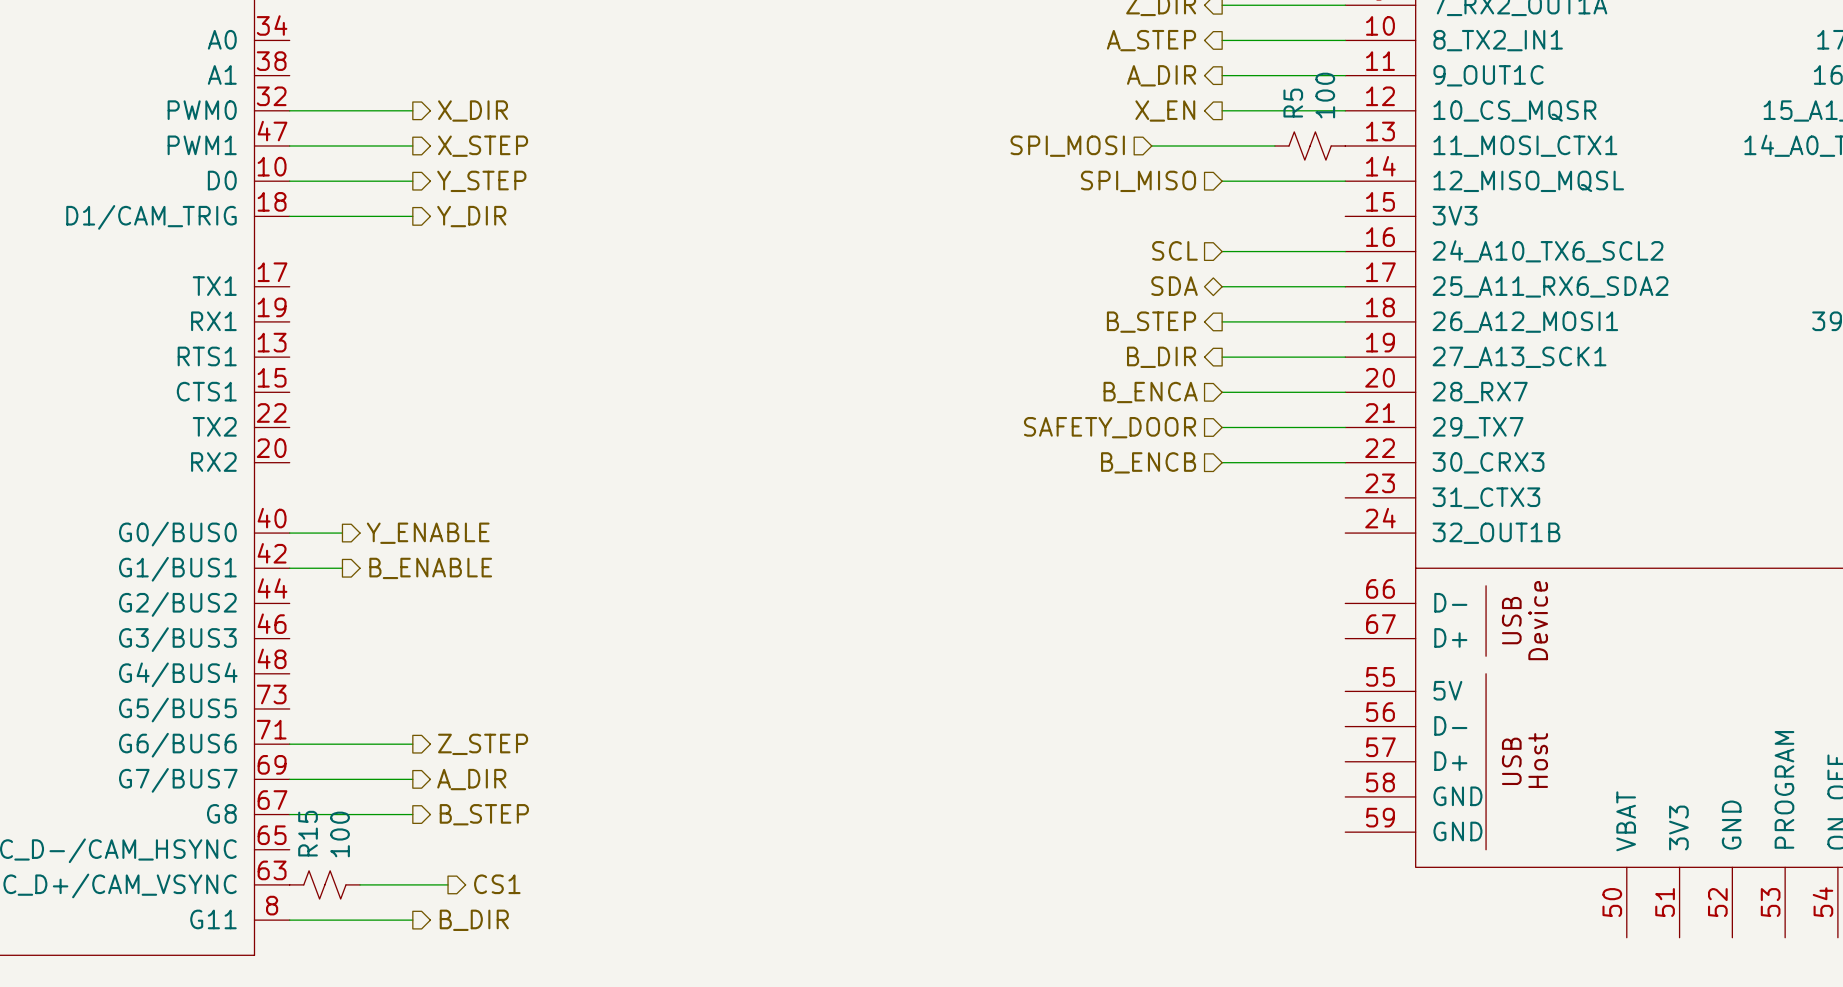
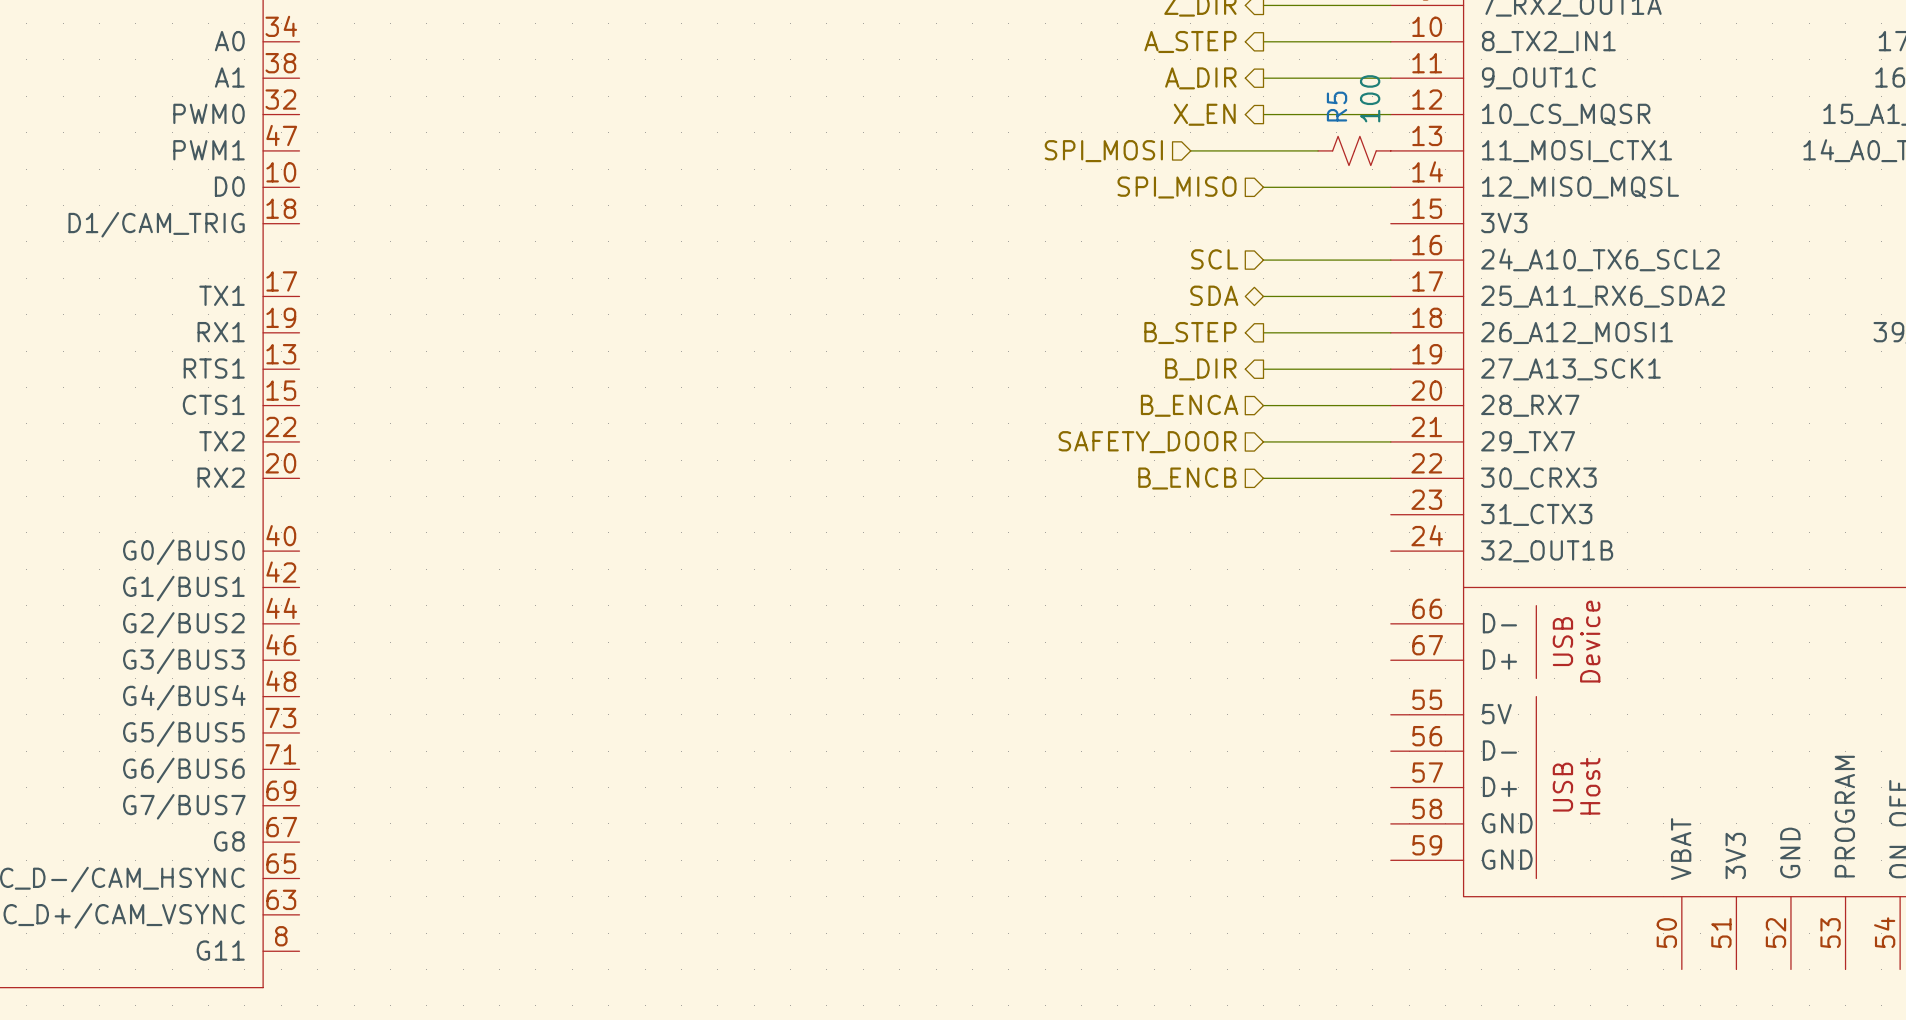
wire: (289, 110) (412, 110) -> none
hierarchical label: X_DIR (473, 110) -> none
wire: (289, 146) (412, 146) -> none
hierarchical label: X_STEP (483, 146) -> none
wire: (289, 181) (412, 181) -> none
hierarchical label: Y_STEP (481, 181) -> none
wire: (289, 216) (412, 216) -> none
hierarchical label: Y_DIR (471, 216) -> none
wire: (289, 533) (342, 533) -> none
hierarchical label: Y_ENABLE (428, 533) -> none
wire: (289, 568) (342, 568) -> none
hierarchical label: B_ENABLE (430, 568) -> none
wire: (289, 744) (412, 744) -> none
hierarchical label: Z_STEP (483, 744) -> none
wire: (289, 779) (412, 779) -> none
hierarchical label: A_DIR (471, 779) -> none
wire: (289, 814) (412, 814) -> none
hierarchical label: B_STEP (484, 814) -> none
R15: 100 (324, 884) -> none
wire: (360, 884) (448, 884) -> none
hierarchical label: CS1 (497, 884) -> none
wire: (289, 920) (412, 920) -> none
hierarchical label: B_DIR (474, 920) -> none

